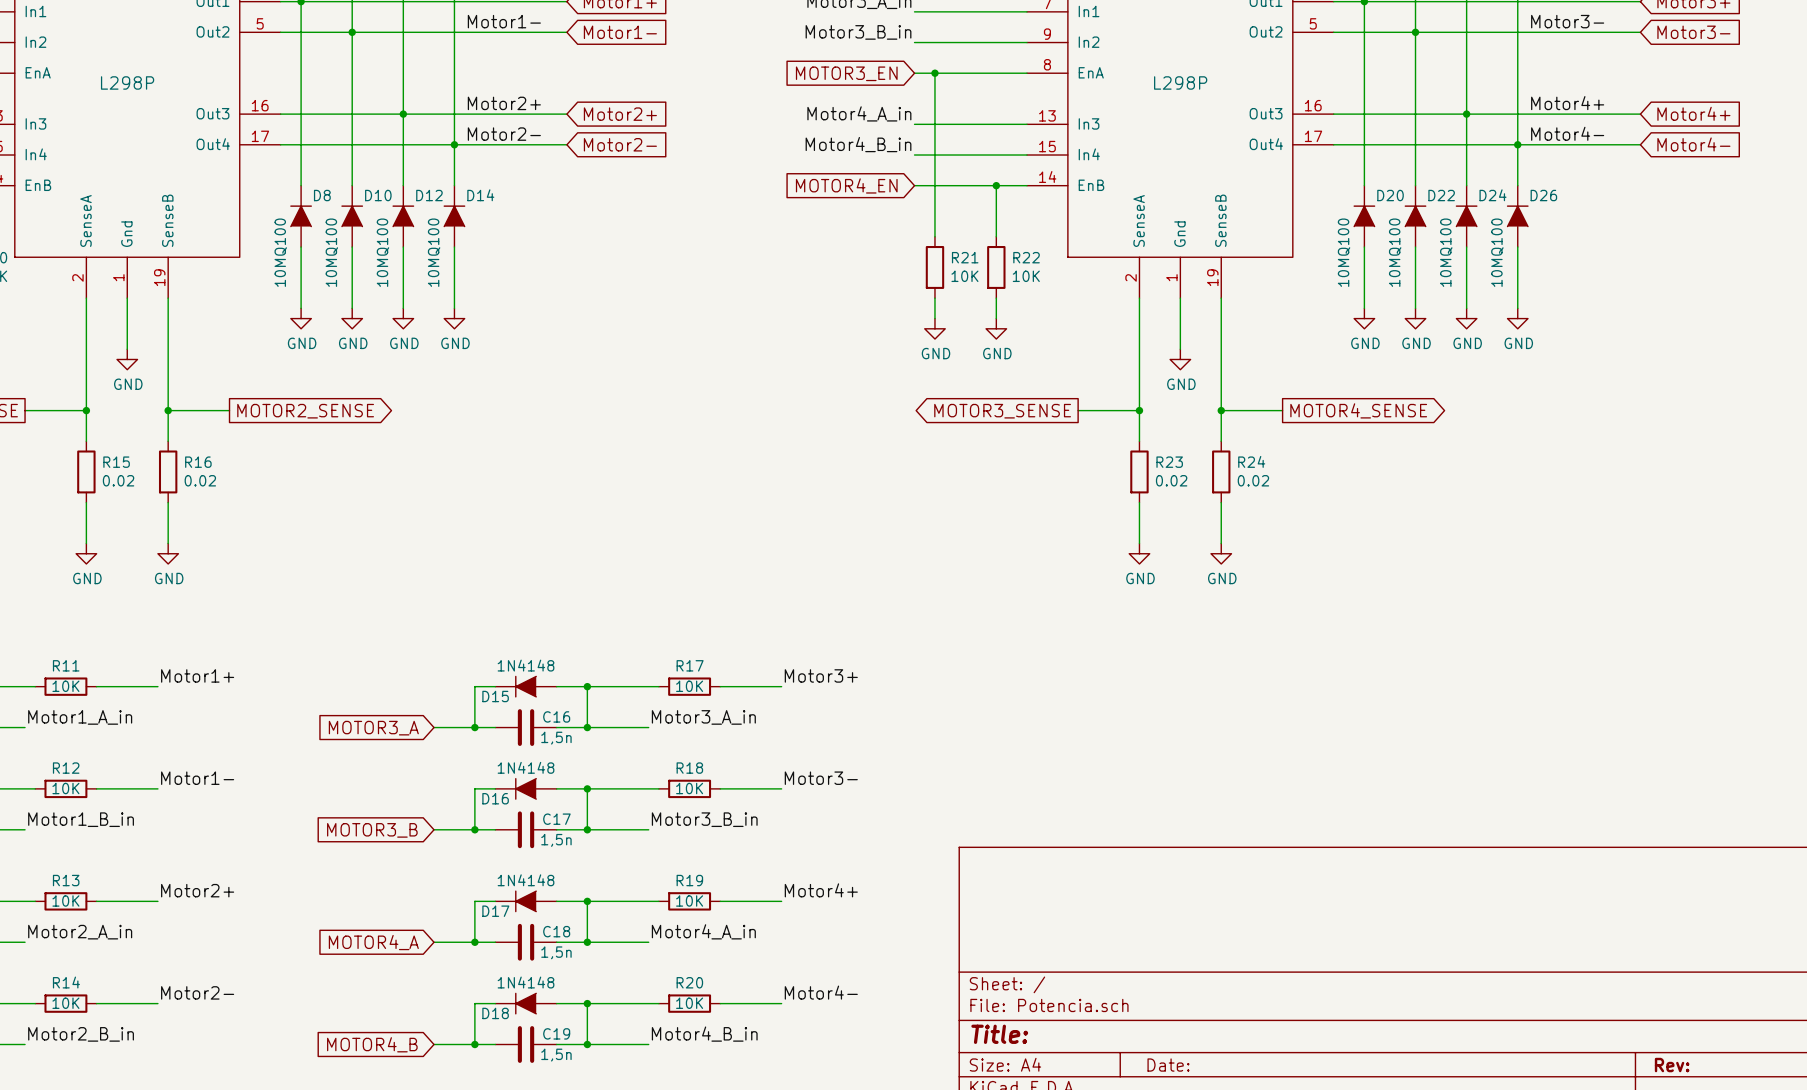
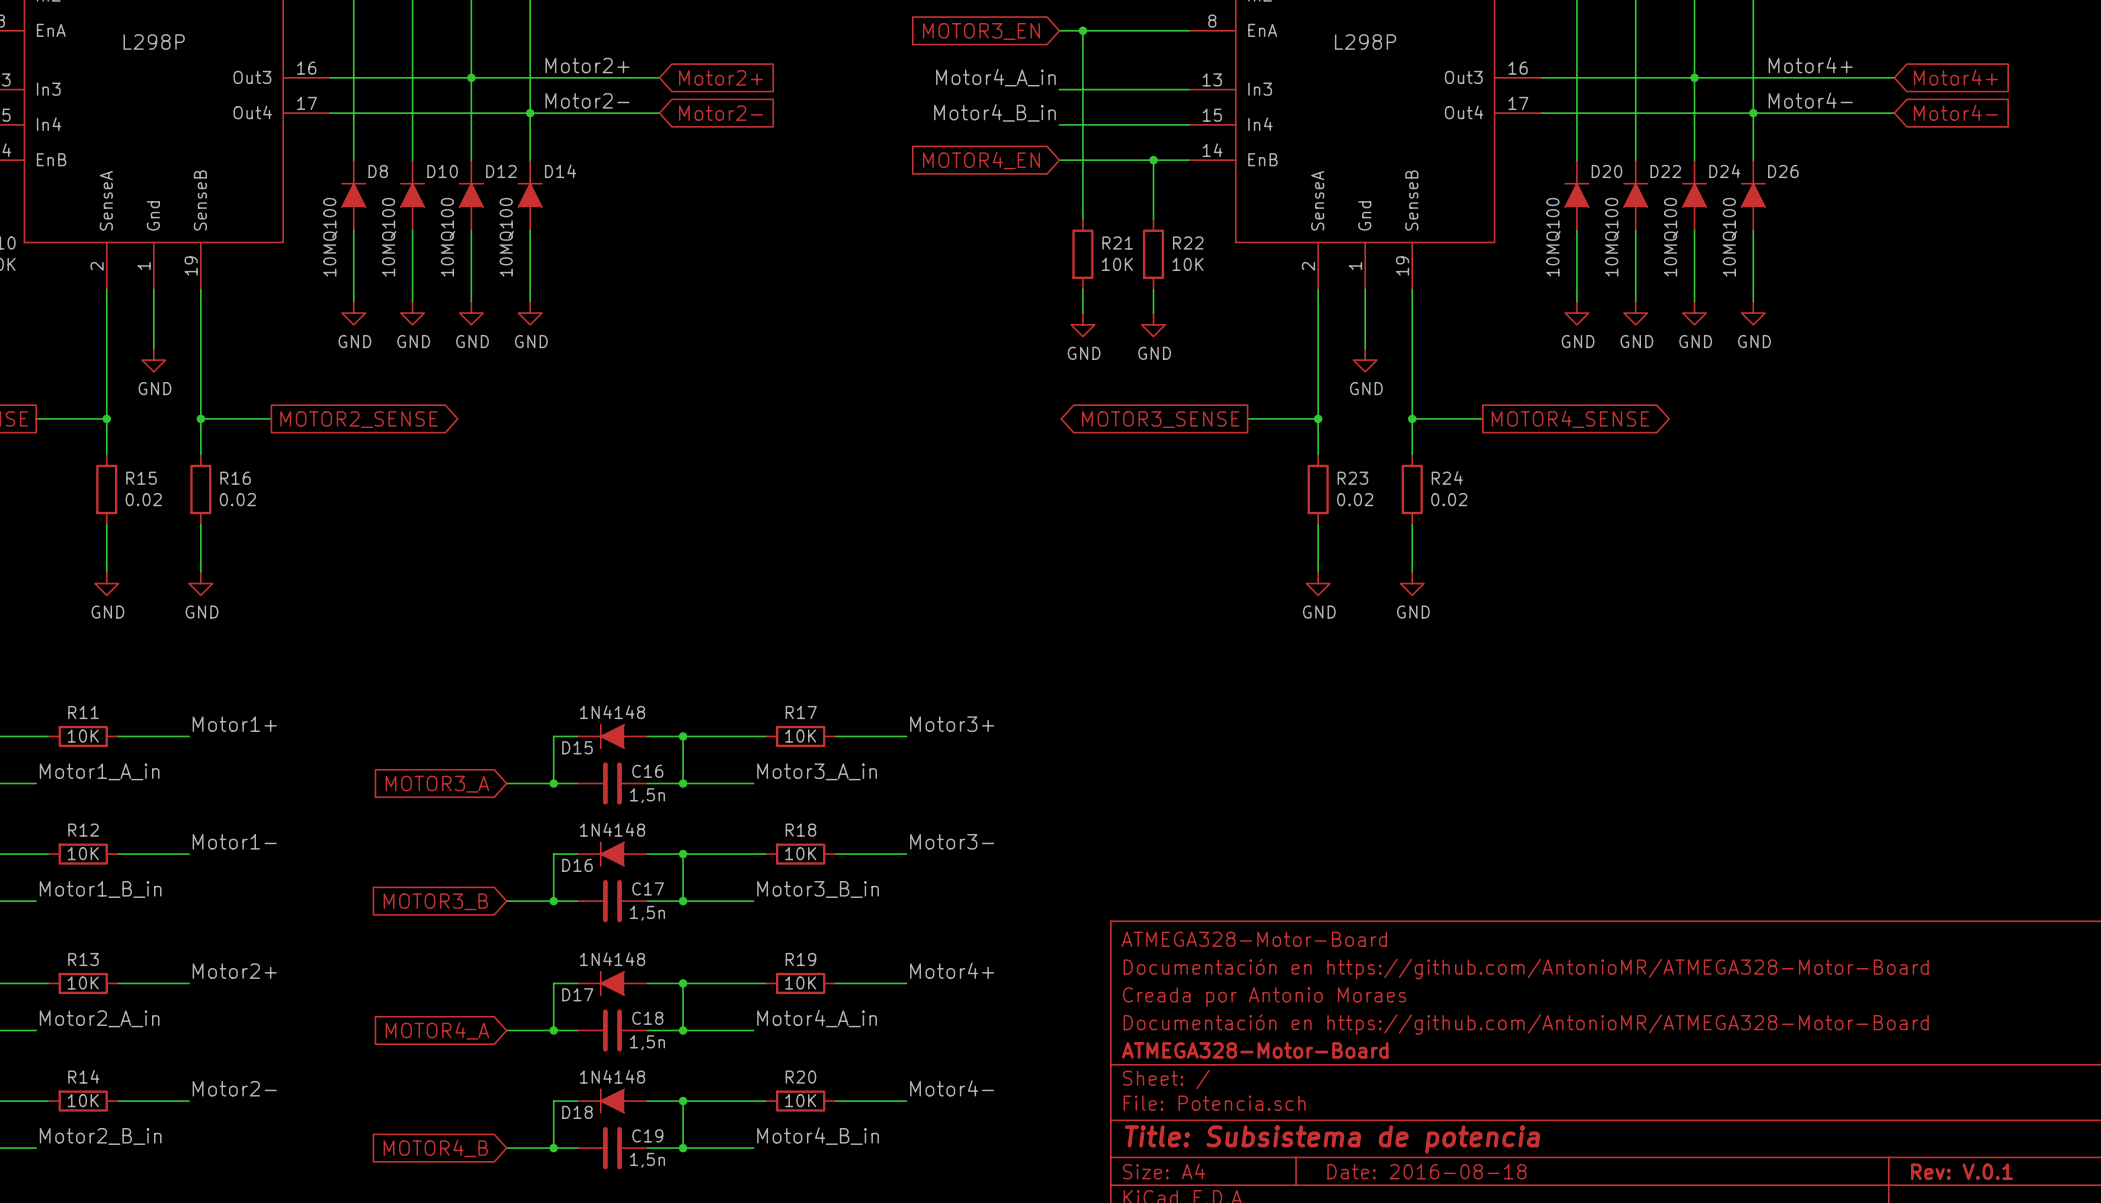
title block: none -> ATMEGA328-Motor-Board (1254, 939)
title block: none -> Documentación en https://github.com/AntonioMR/ATMEGA328-Motor-Board (1526, 969)
title block: none -> Creada por Antonio Moraes (1264, 997)
title block: none -> Documentación en https://github.com/AntonioMR/ATMEGA328-Motor-Board (1526, 1024)
title block: none -> ATMEGA328-Motor-Board (1255, 1050)
title block: Title: (999, 1034) -> Title: Subsistema de potencia (1332, 1139)
title block: Date: (1168, 1065) -> Date: 2016-08-18 (1426, 1171)
title block: Rev: (1672, 1065) -> Rev: V.0.1 (1962, 1171)

